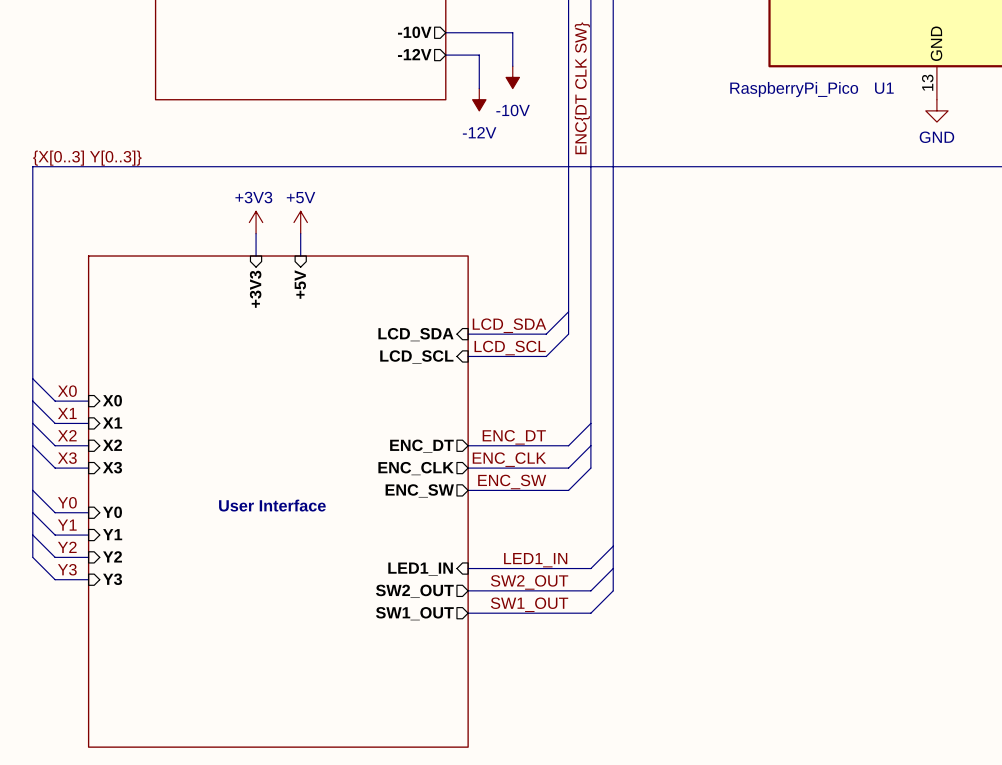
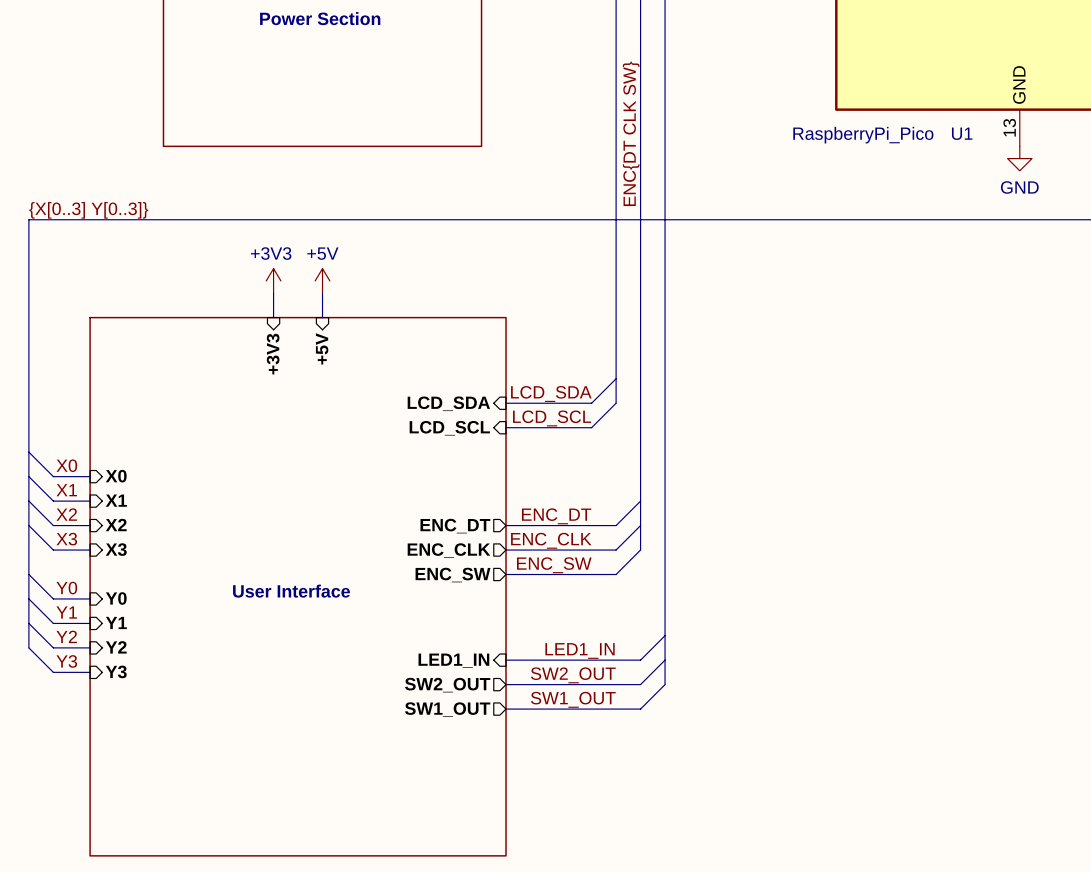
sheet pin: -10V (414, 32) -> none
wire: (445, 32) (512, 32) (512, 66) -> none
sheet pin: -12V (414, 54) -> none
wire: (445, 55) (479, 55) (479, 88) -> none
power symbol: -10V (512, 77) -> none
power symbol: -12V (479, 99) -> none

